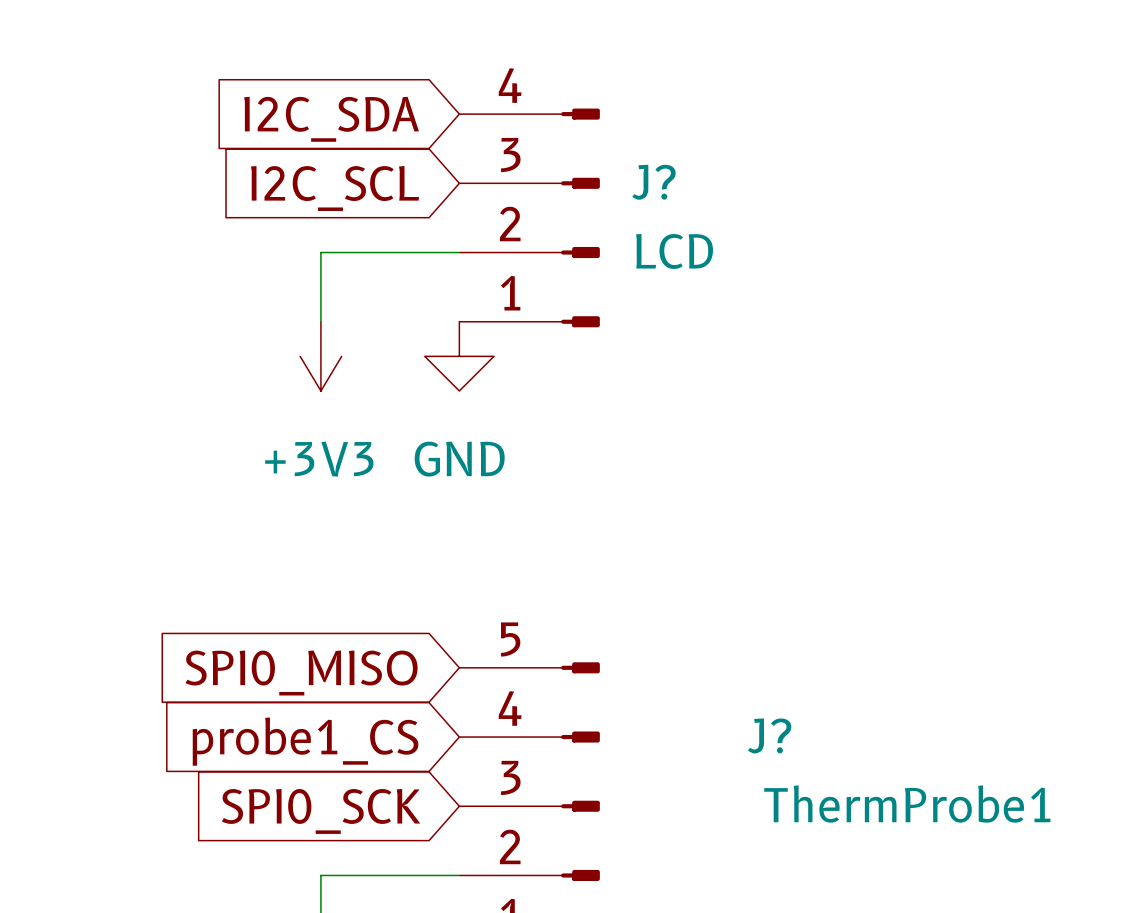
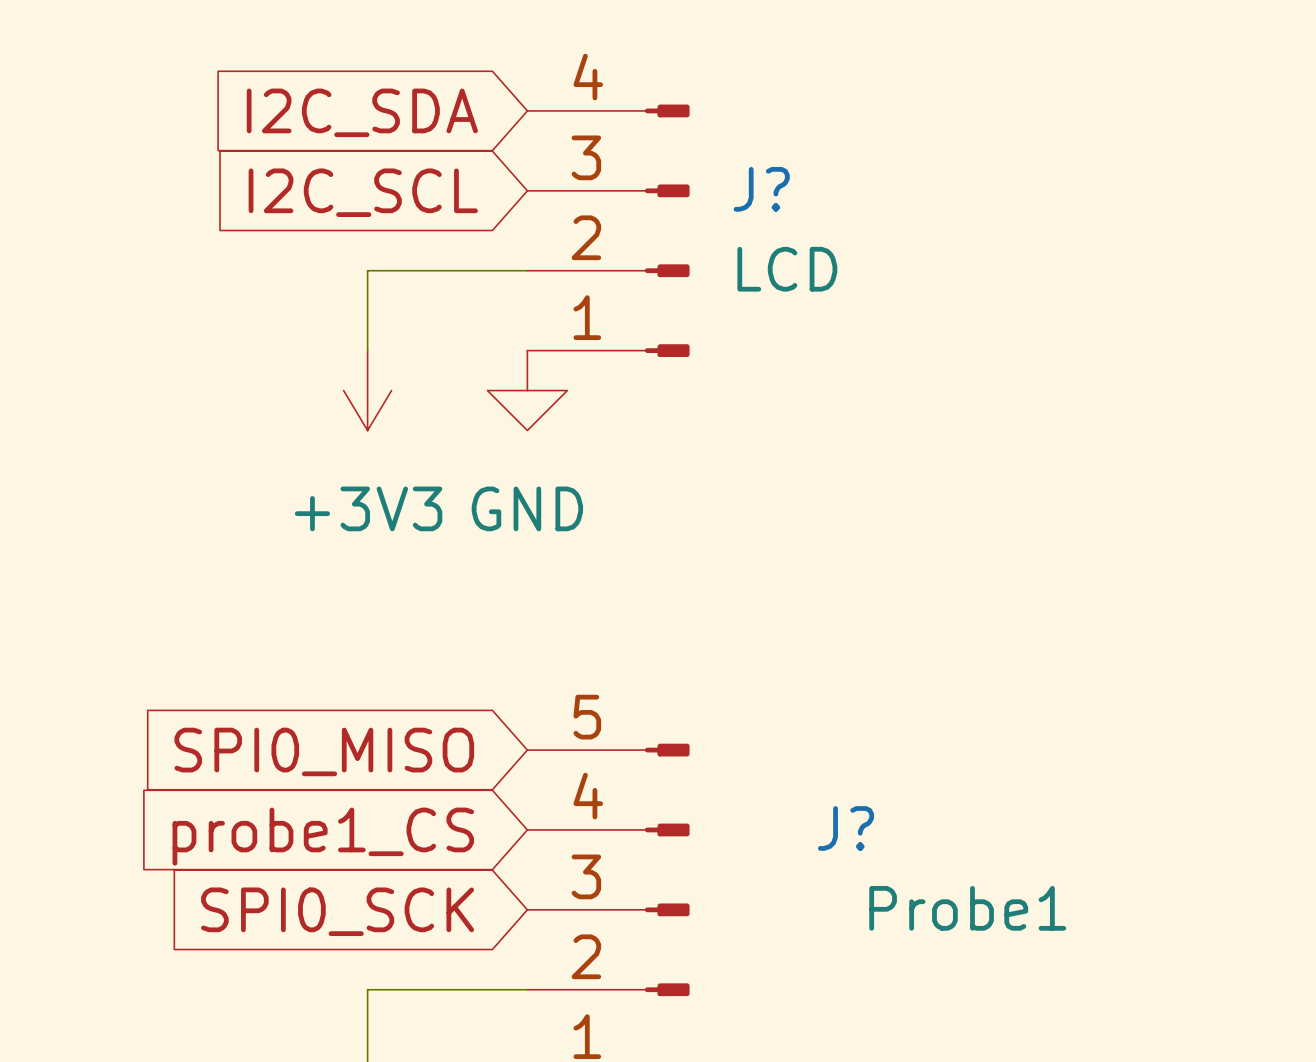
J? name position: J? (769, 735) -> J? (846, 828)
J? value: ThermProbe1 (907, 804) -> Probe1 (967, 908)

